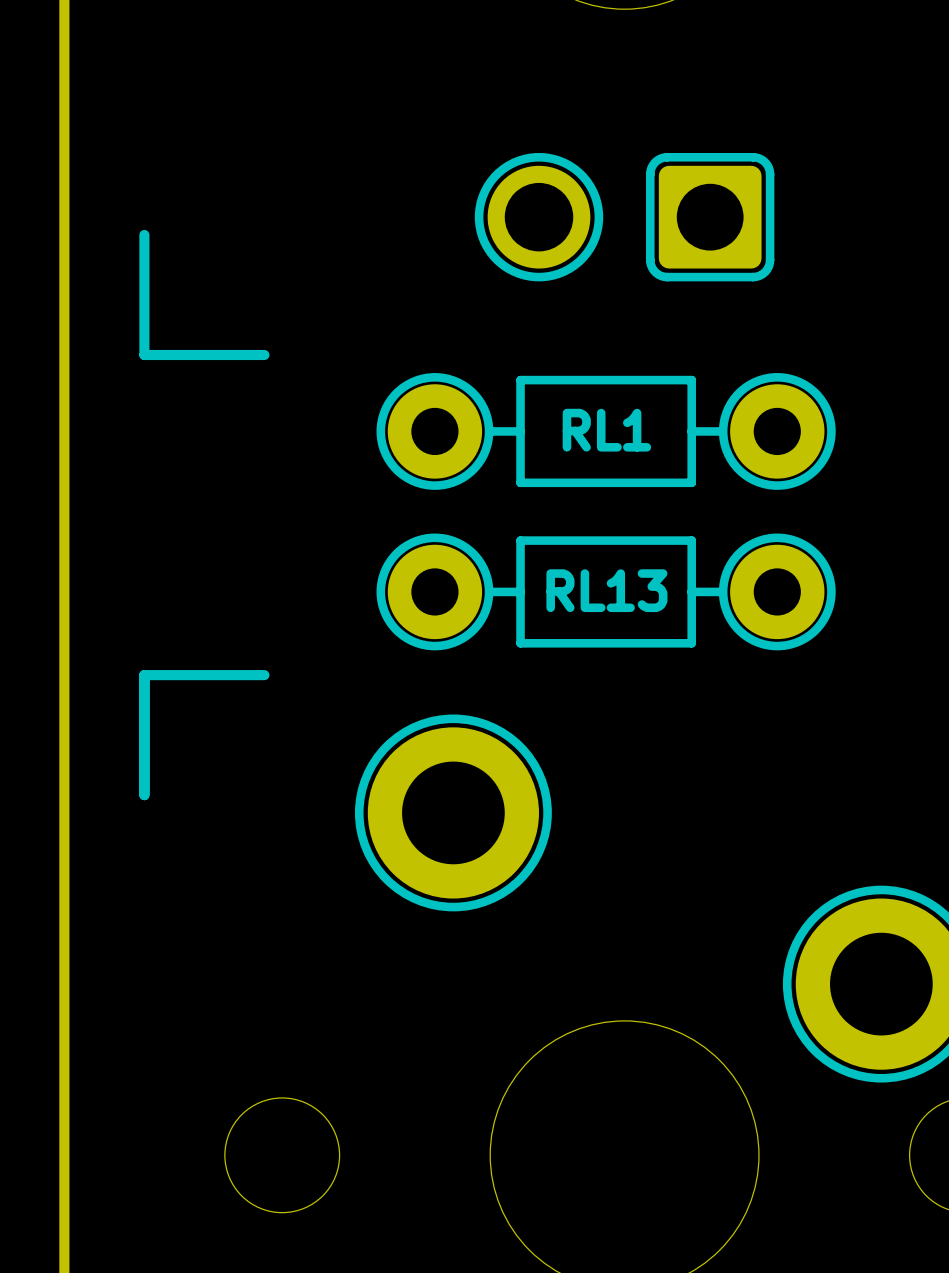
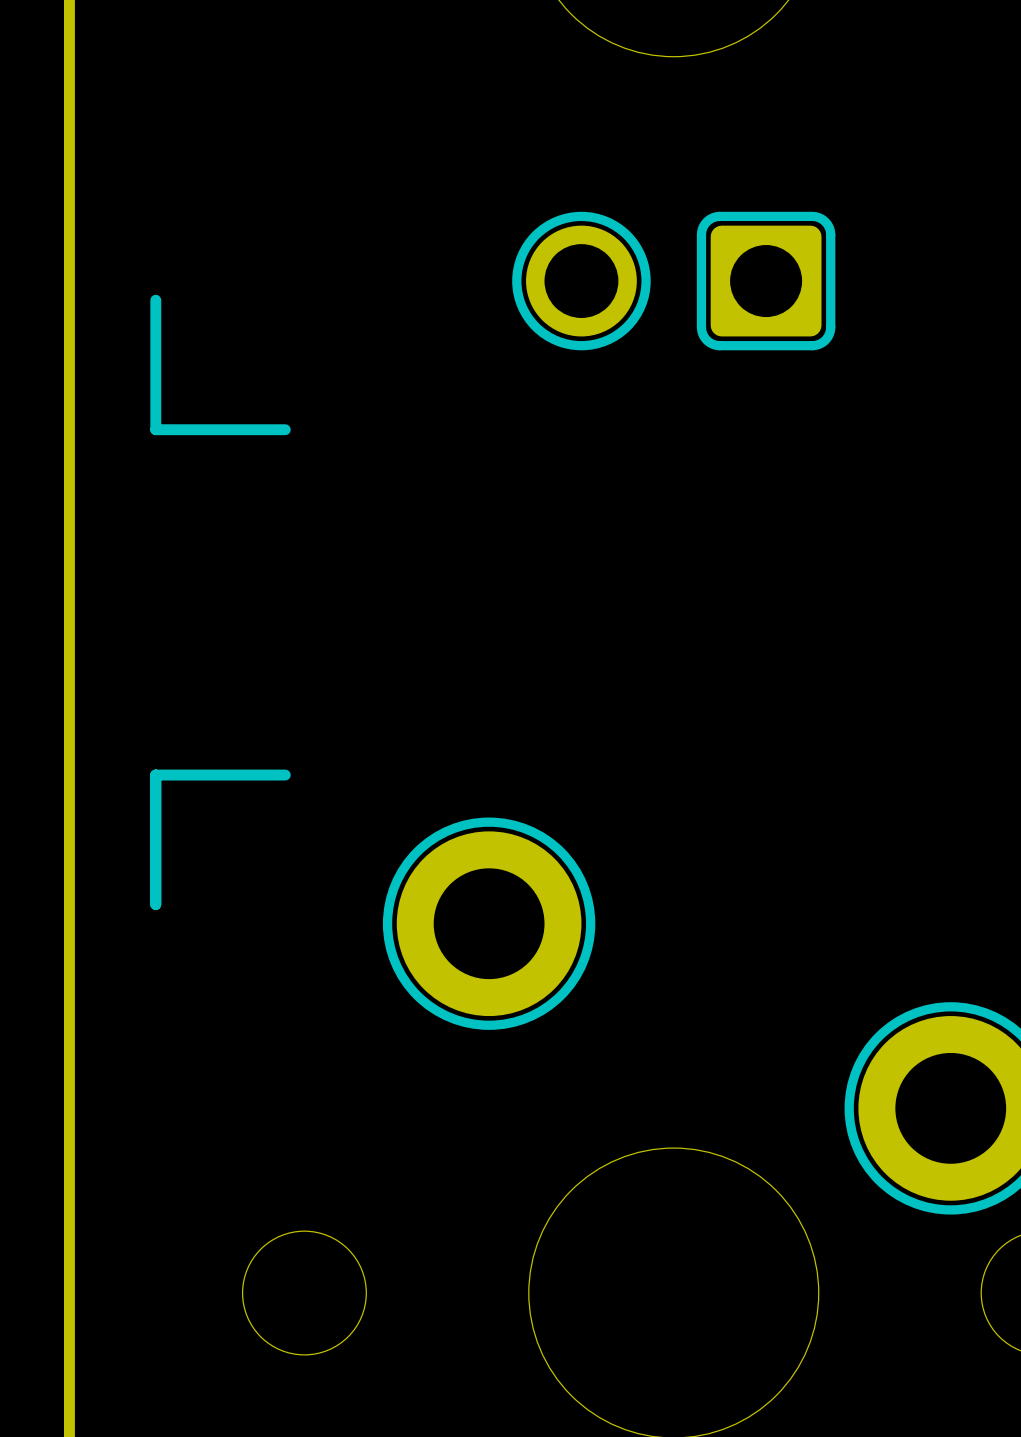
RL1: (606, 431) -> none
RL13: (606, 591) -> none

